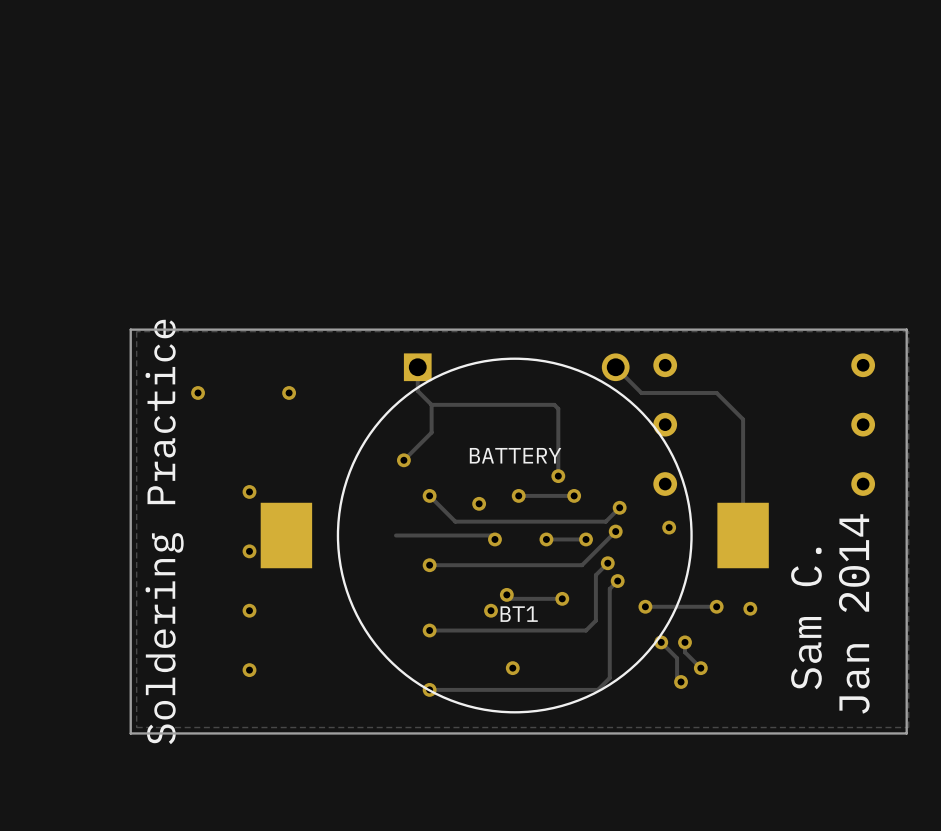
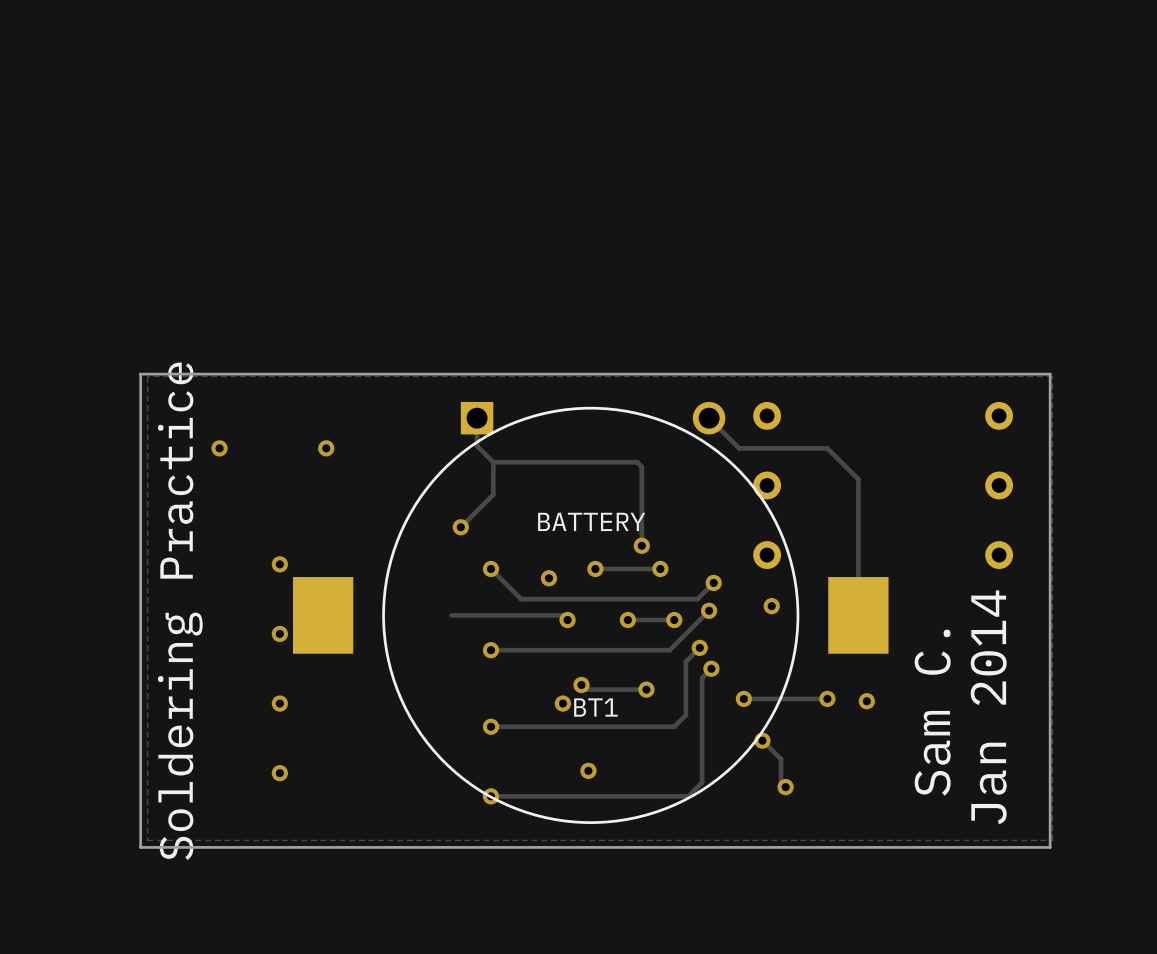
track: (685, 642) (685, 652) (700, 668) -> none
via: (685, 642) -> none
via: (700, 668) -> none

